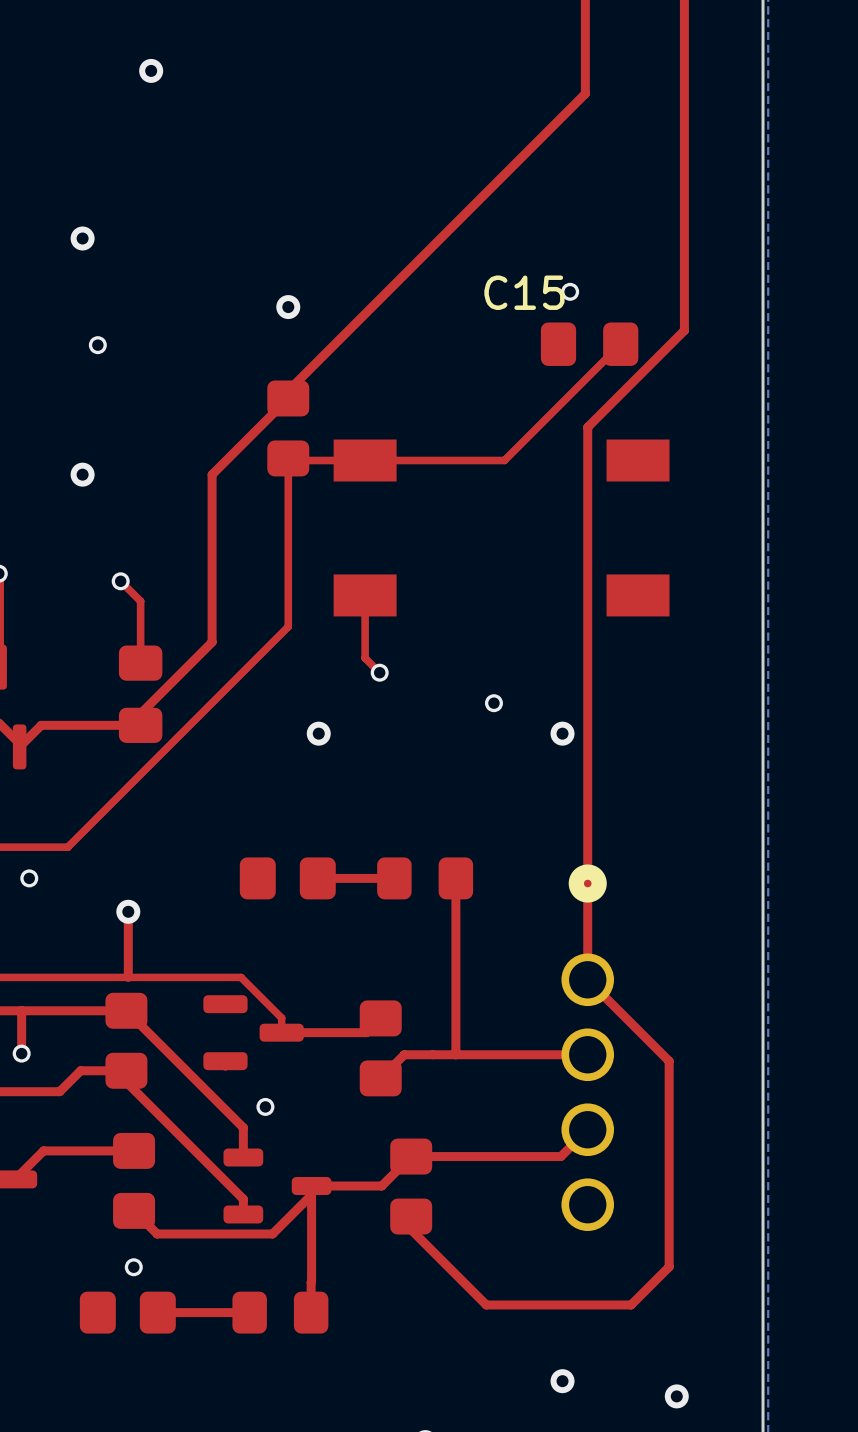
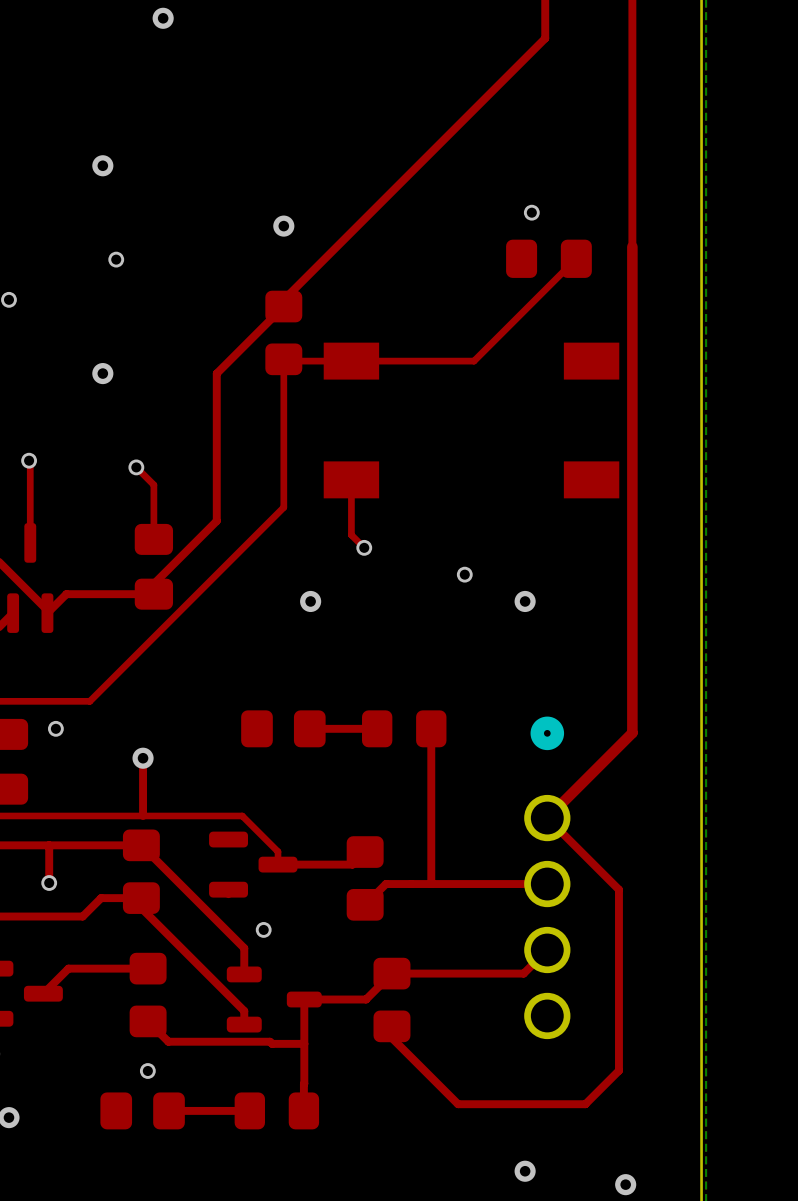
C15 name: C15 (524, 292) -> none
top track: (684, 330) (587, 427) (587, 979) -> (632, 246) (632, 732) (547, 818)
top track: (311, 1194) (272, 1233) -> (304, 1043) (272, 1043) (270, 1041)

